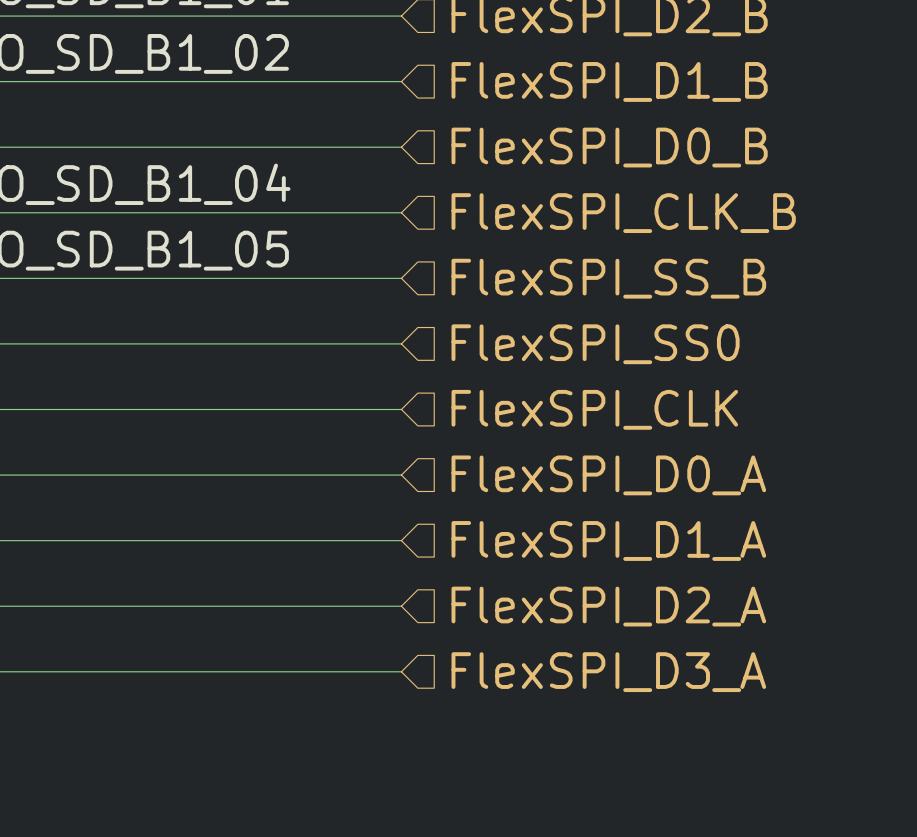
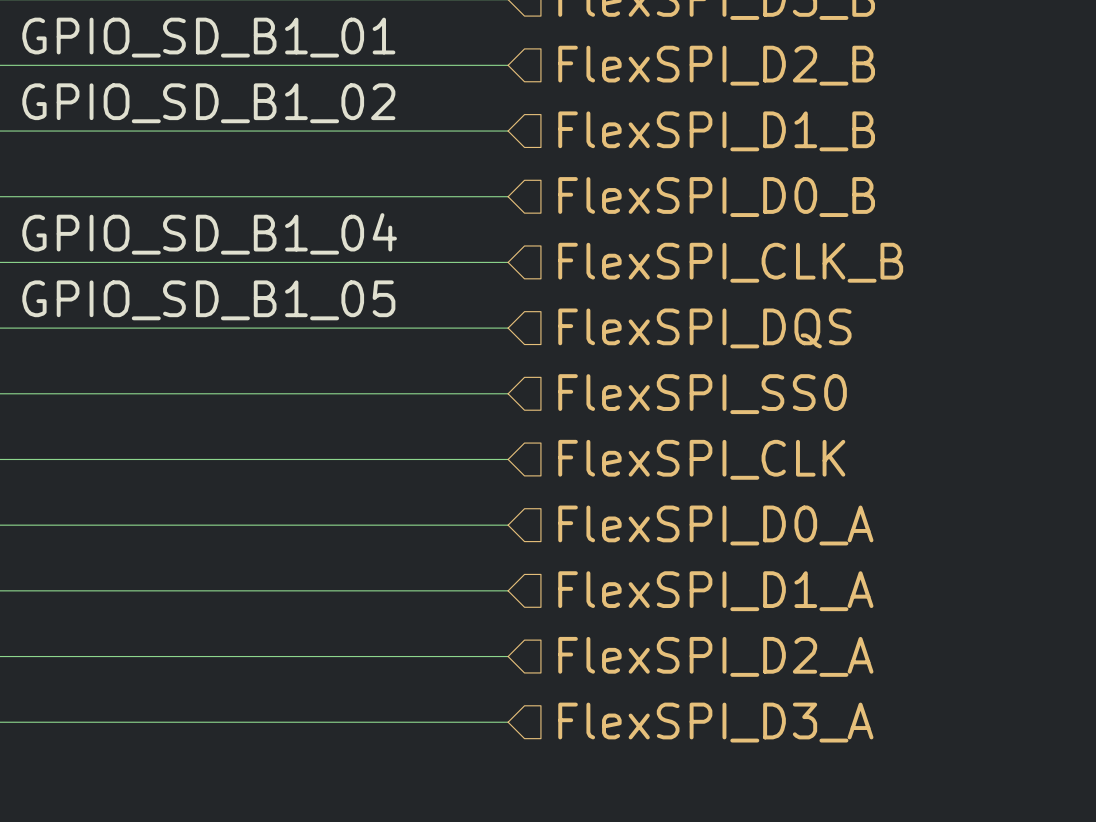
hierarchical label: FlexSPI_SS_B (608, 278) -> FlexSPI_DQS (704, 328)

